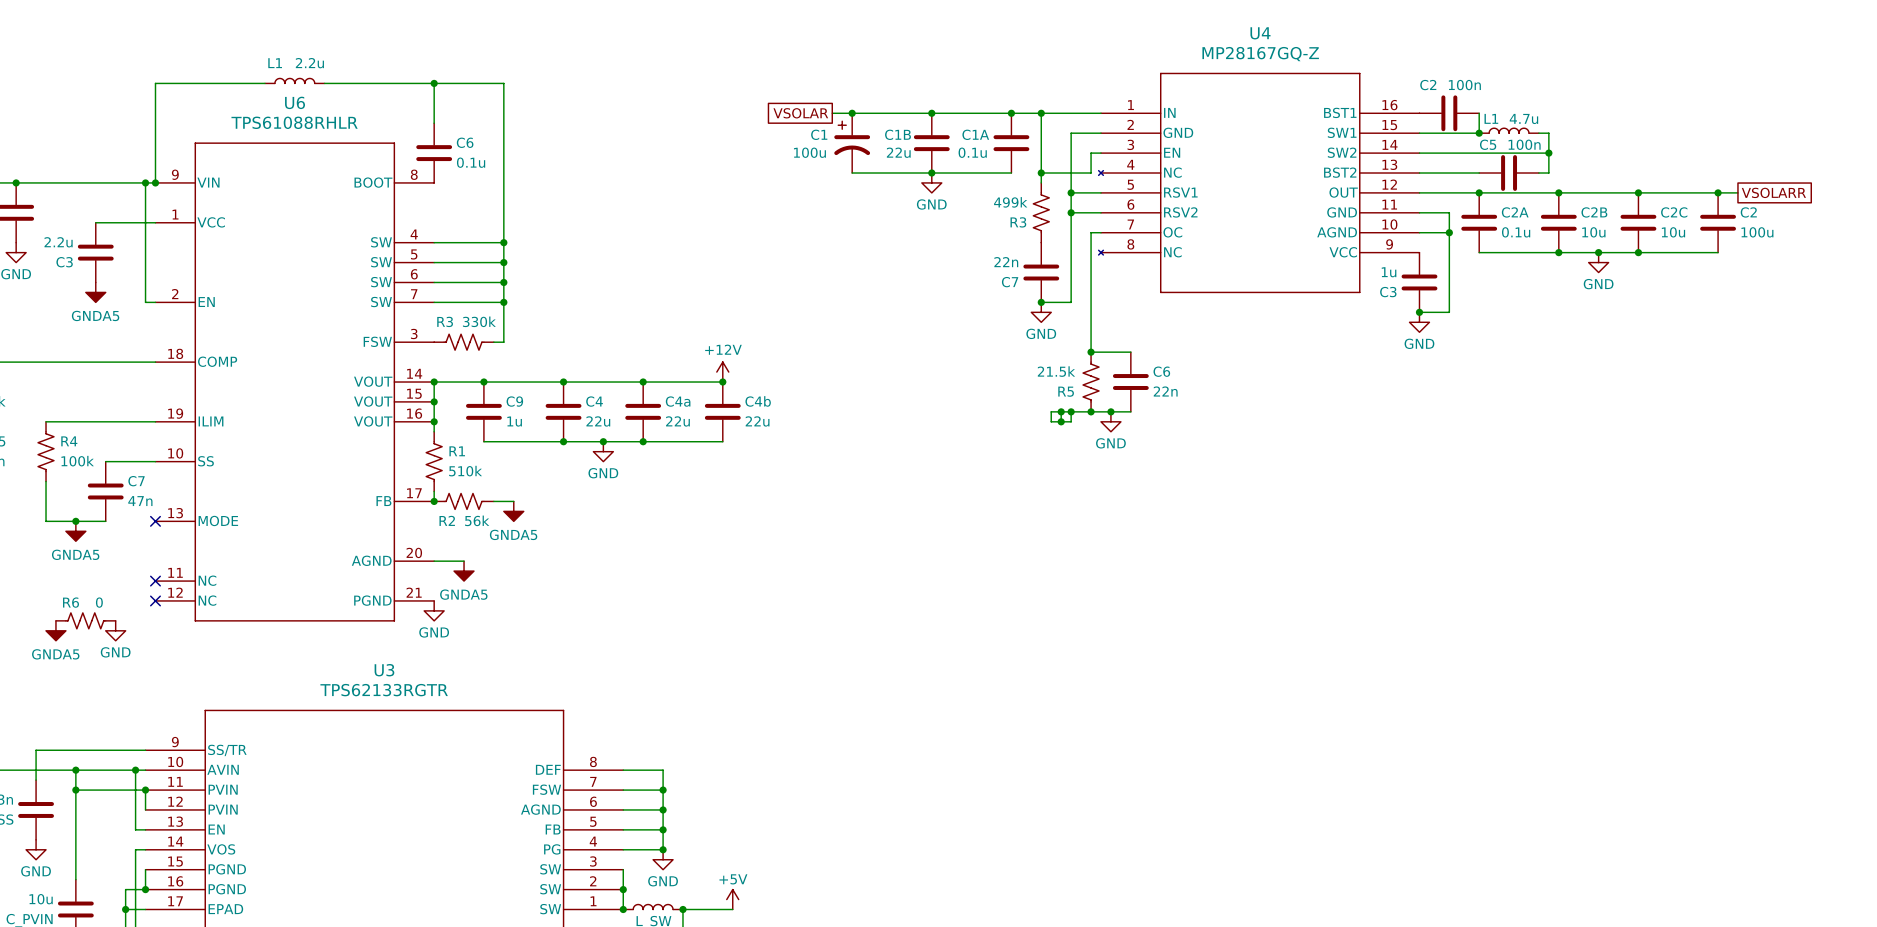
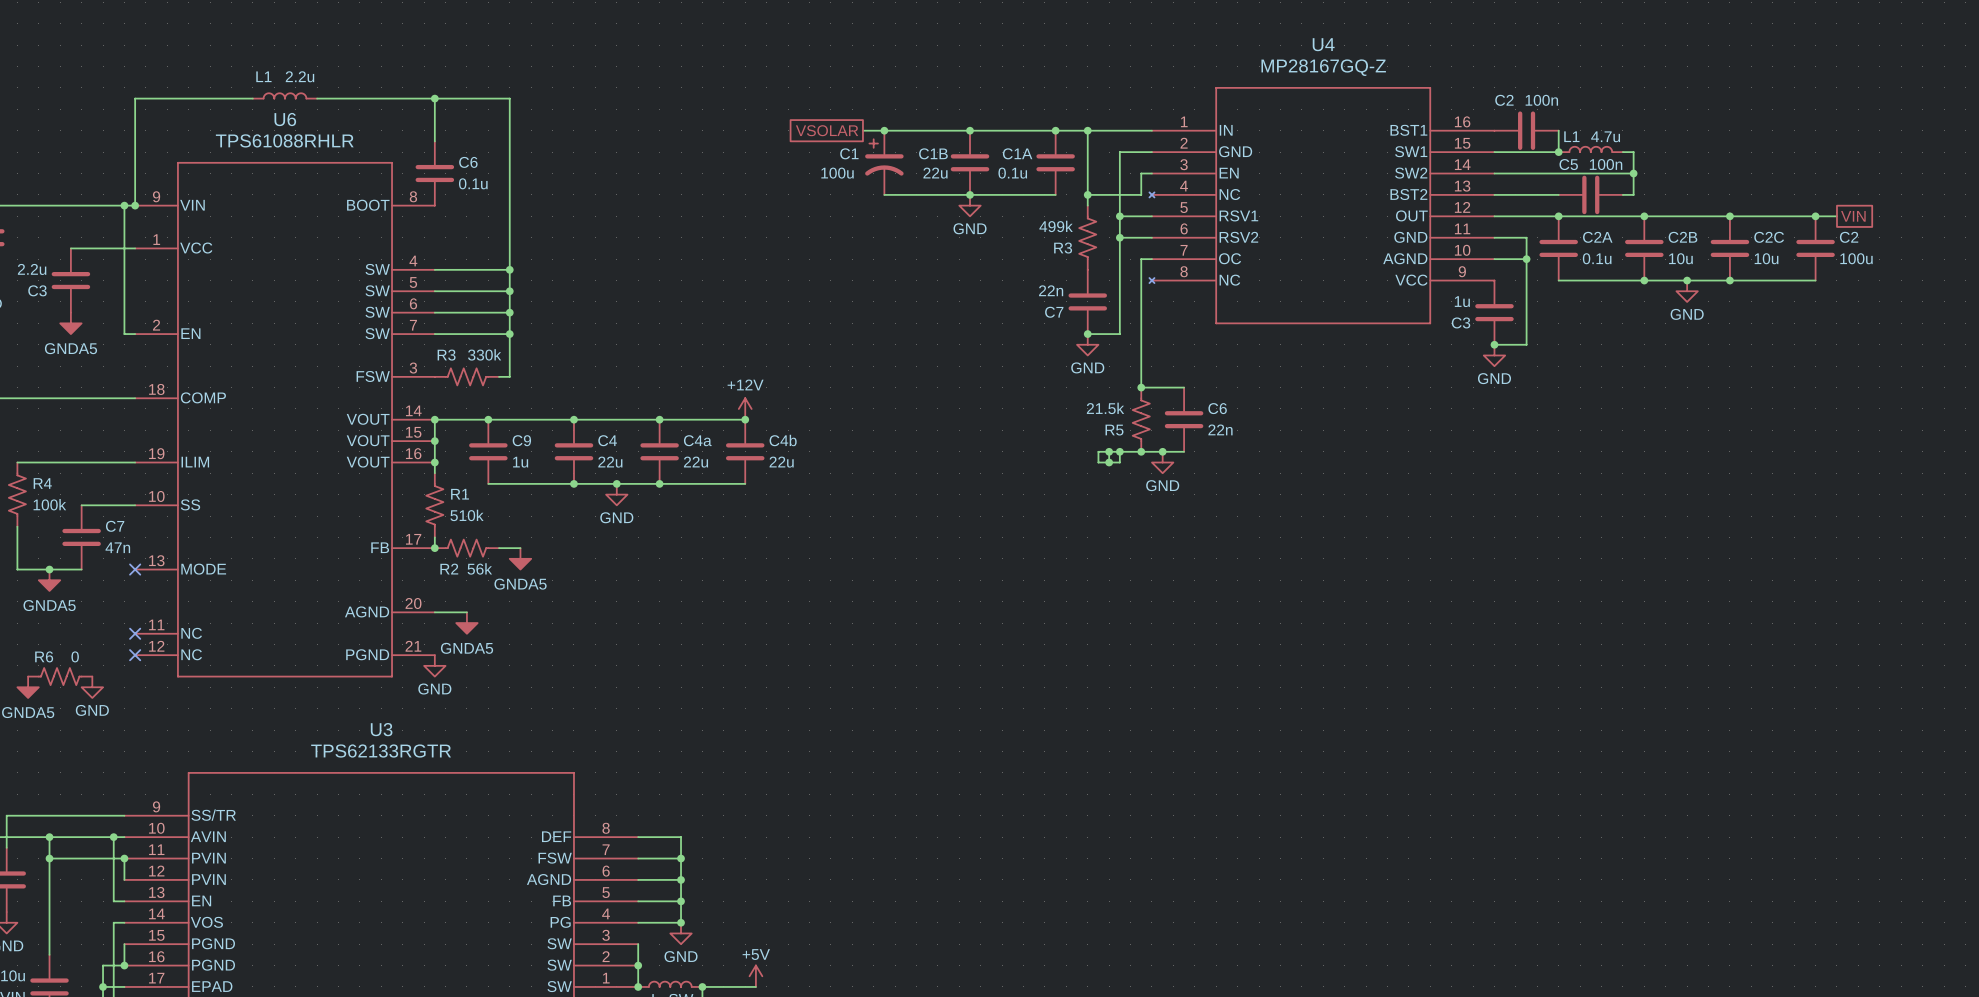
global label: VSOLARR (1773, 192) -> VIN (1853, 216)

